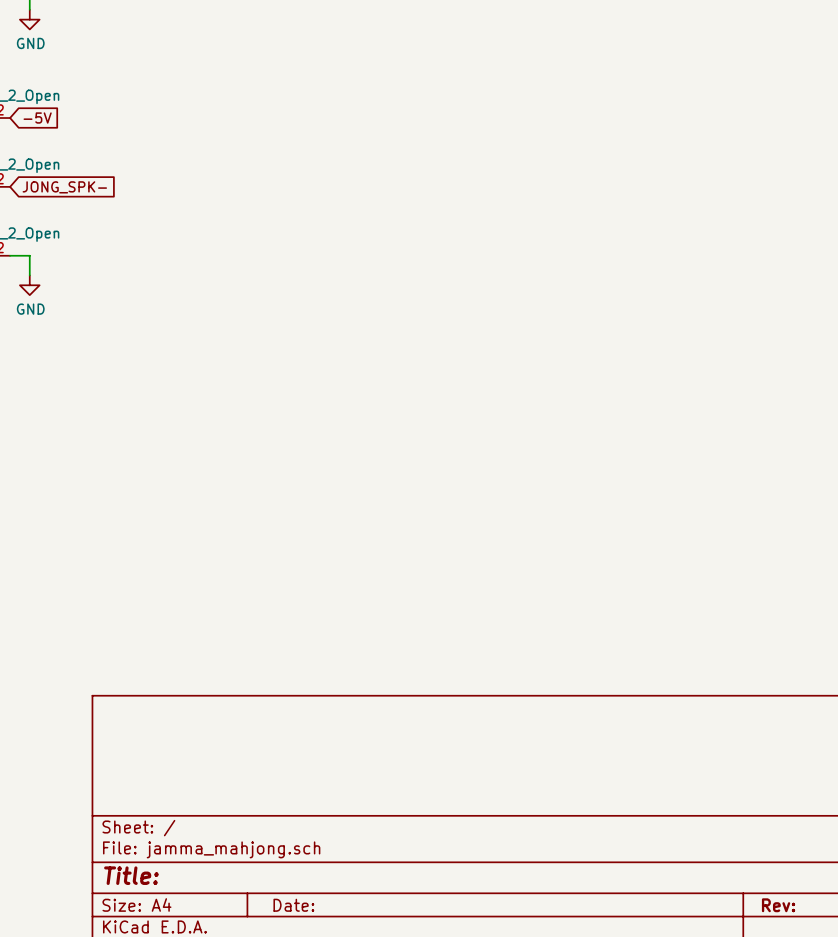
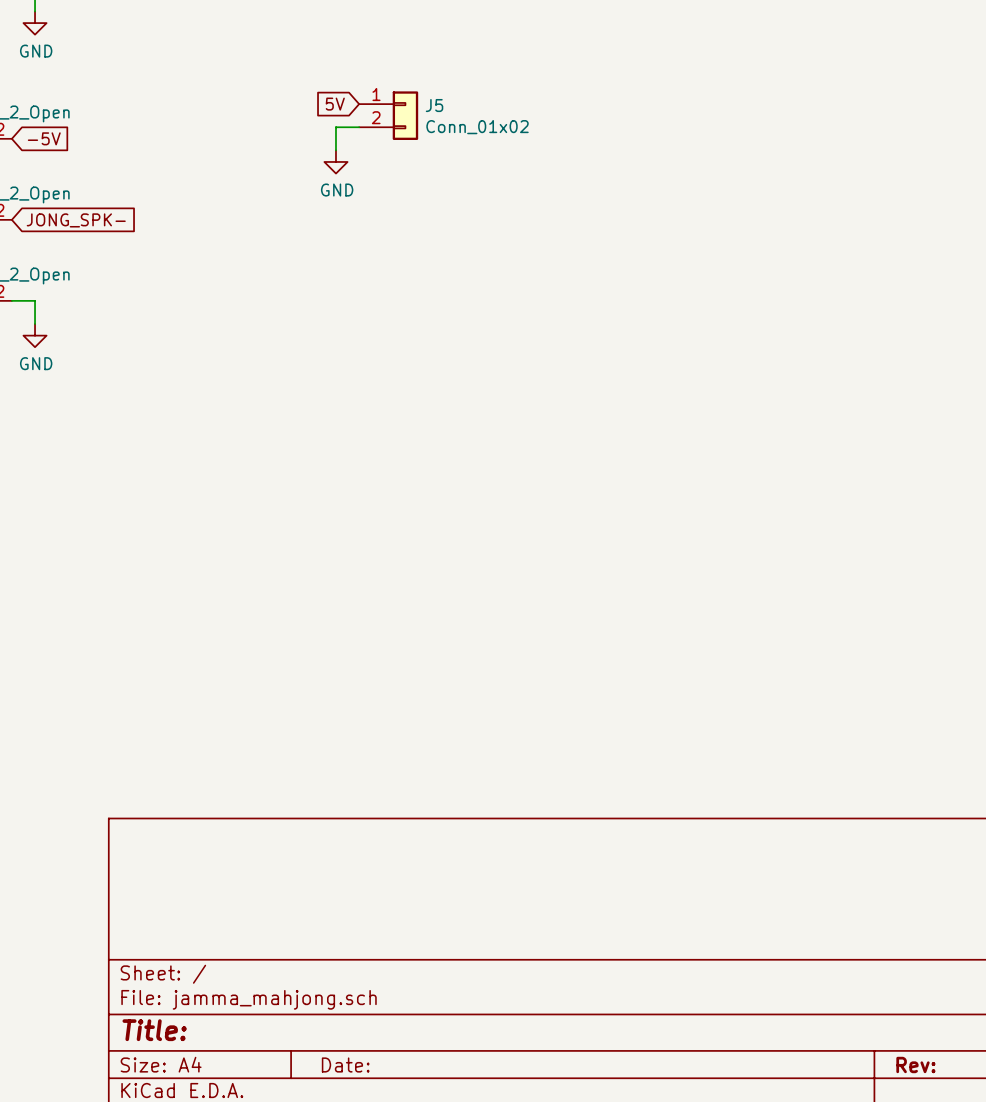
global label: none -> 5V (335, 104)
J5: none -> Conn_01x02 (388, 115)
wire: none -> (359, 127) (335, 127) (335, 150)
power symbol: none -> GND (335, 161)

